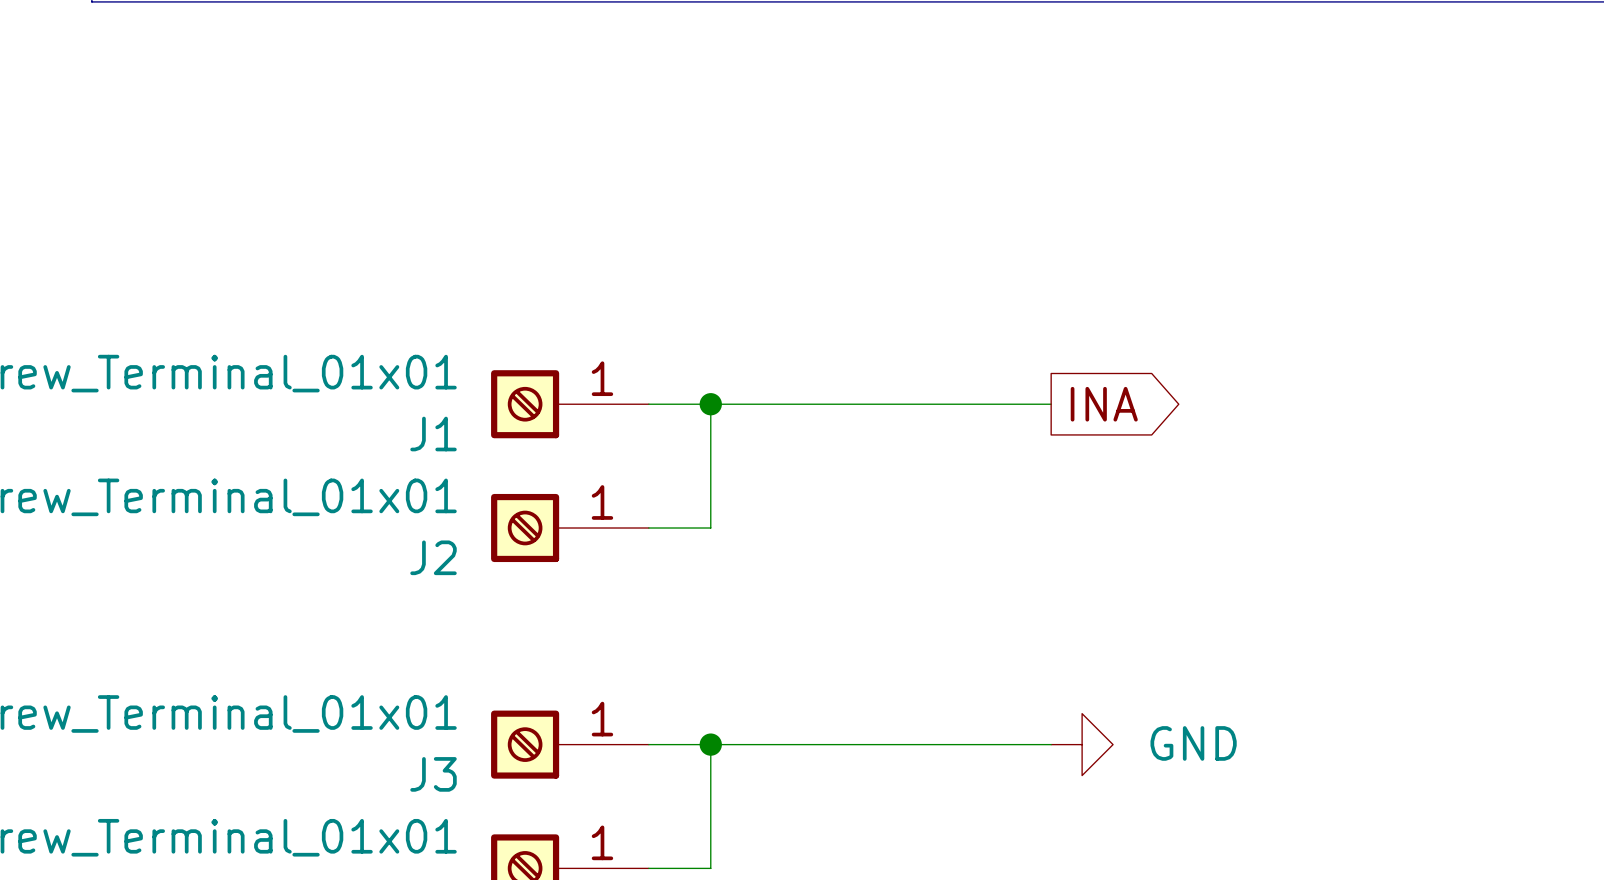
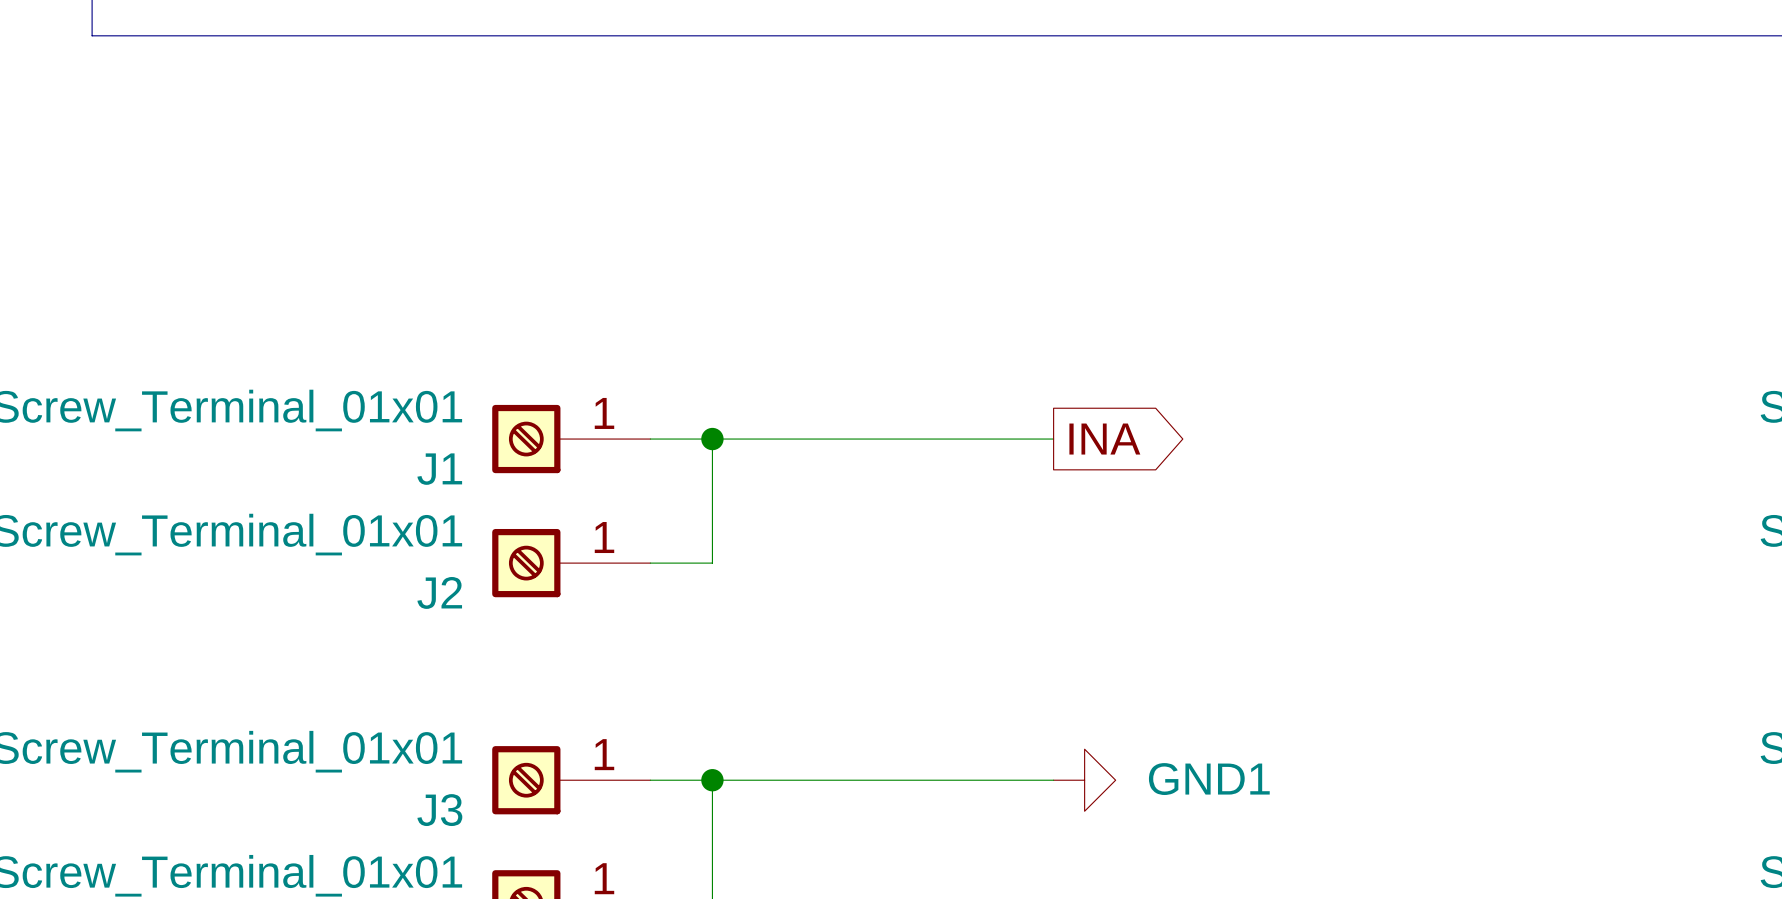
power symbol: GND (1082, 744) -> GND1 (1084, 780)

